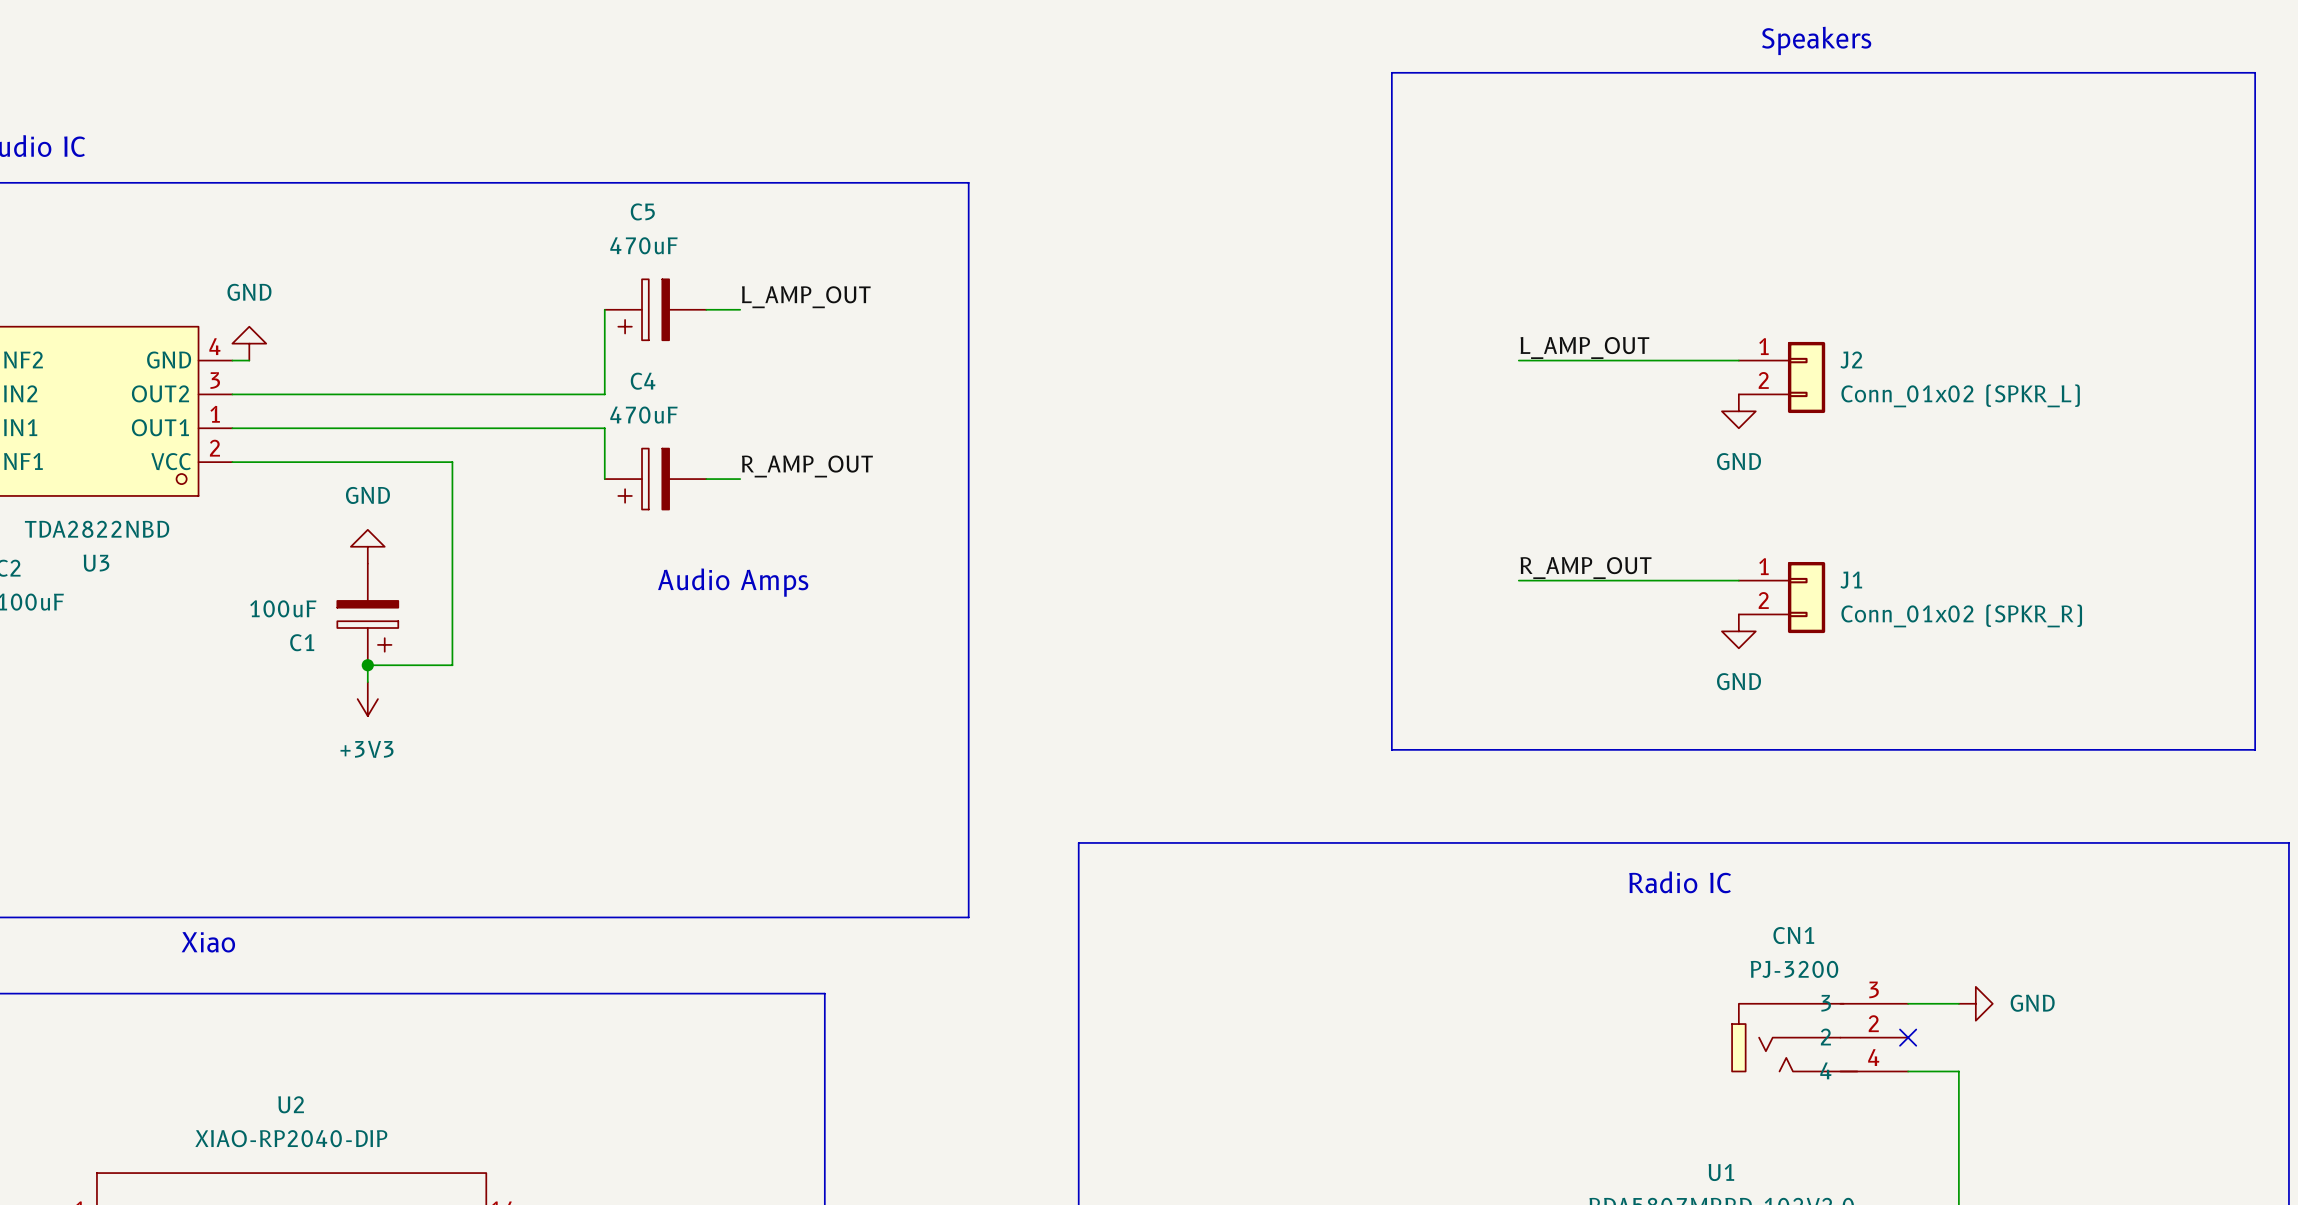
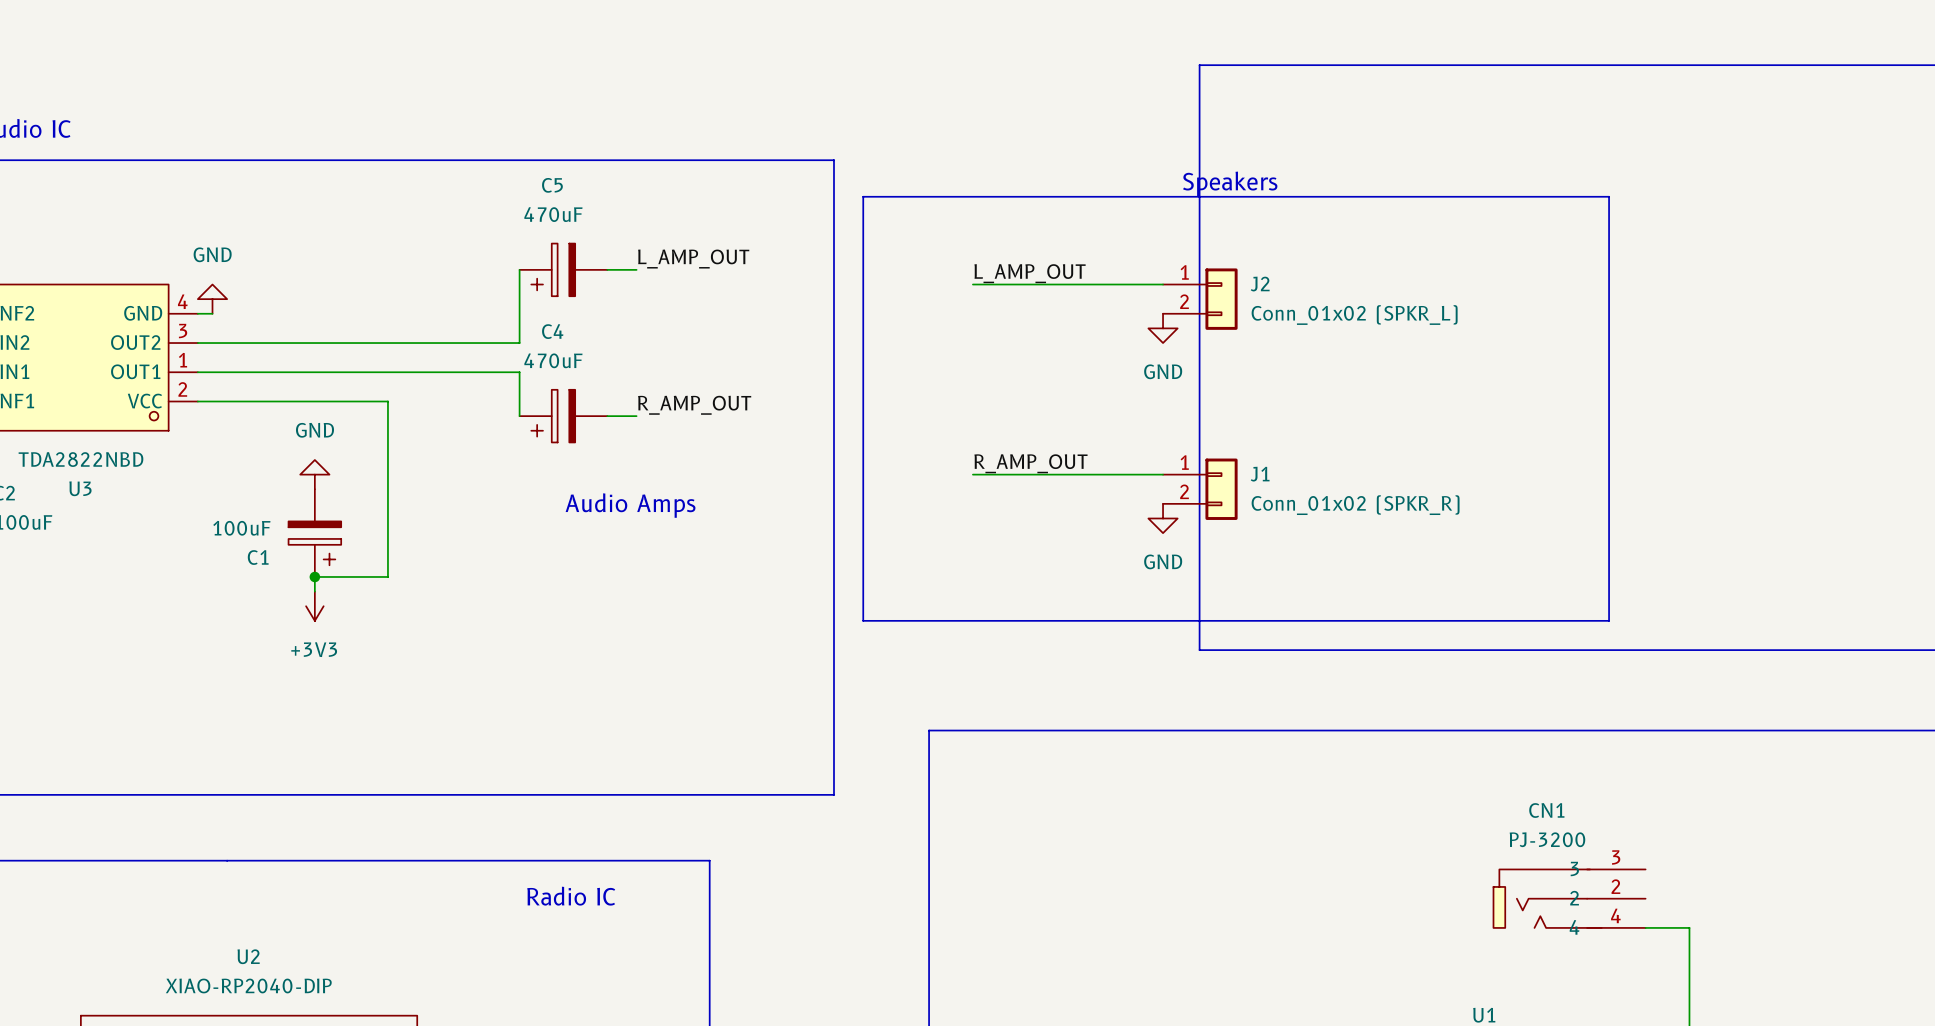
text: Speakers (1816, 40) -> none
text: none -> Speakers (1230, 183)
line: none -> (863, 196) (863, 620) (1609, 620) (1609, 196) (863, 196)
label: none -> L_AMP_OUT (1030, 273)
wire: none -> (972, 284) (1163, 284)
label: L_AMP_OUT (1584, 347) -> none
wire: (1518, 360) (1738, 360) -> none
power symbol: none -> GND (1163, 328)
J2 position: (1782, 377) -> (1200, 299)
power symbol: GND (1738, 411) -> none
label: none -> R_AMP_OUT (1030, 463)
wire: none -> (972, 474) (1163, 474)
label: R_AMP_OUT (1586, 568) -> none
wire: (1518, 580) (1738, 580) -> none
power symbol: none -> GND (1163, 518)
J1 position: (1782, 597) -> (1200, 489)
power symbol: GND (1738, 631) -> none
text: Radio IC (1680, 882) -> none
text: Xiao (208, 942) -> none
wire: (1908, 1003) (1958, 1003) -> none
power symbol: GND (1975, 1003) -> none
text: none -> Radio IC (571, 896)
no-connect mark: (1908, 1037) -> none

